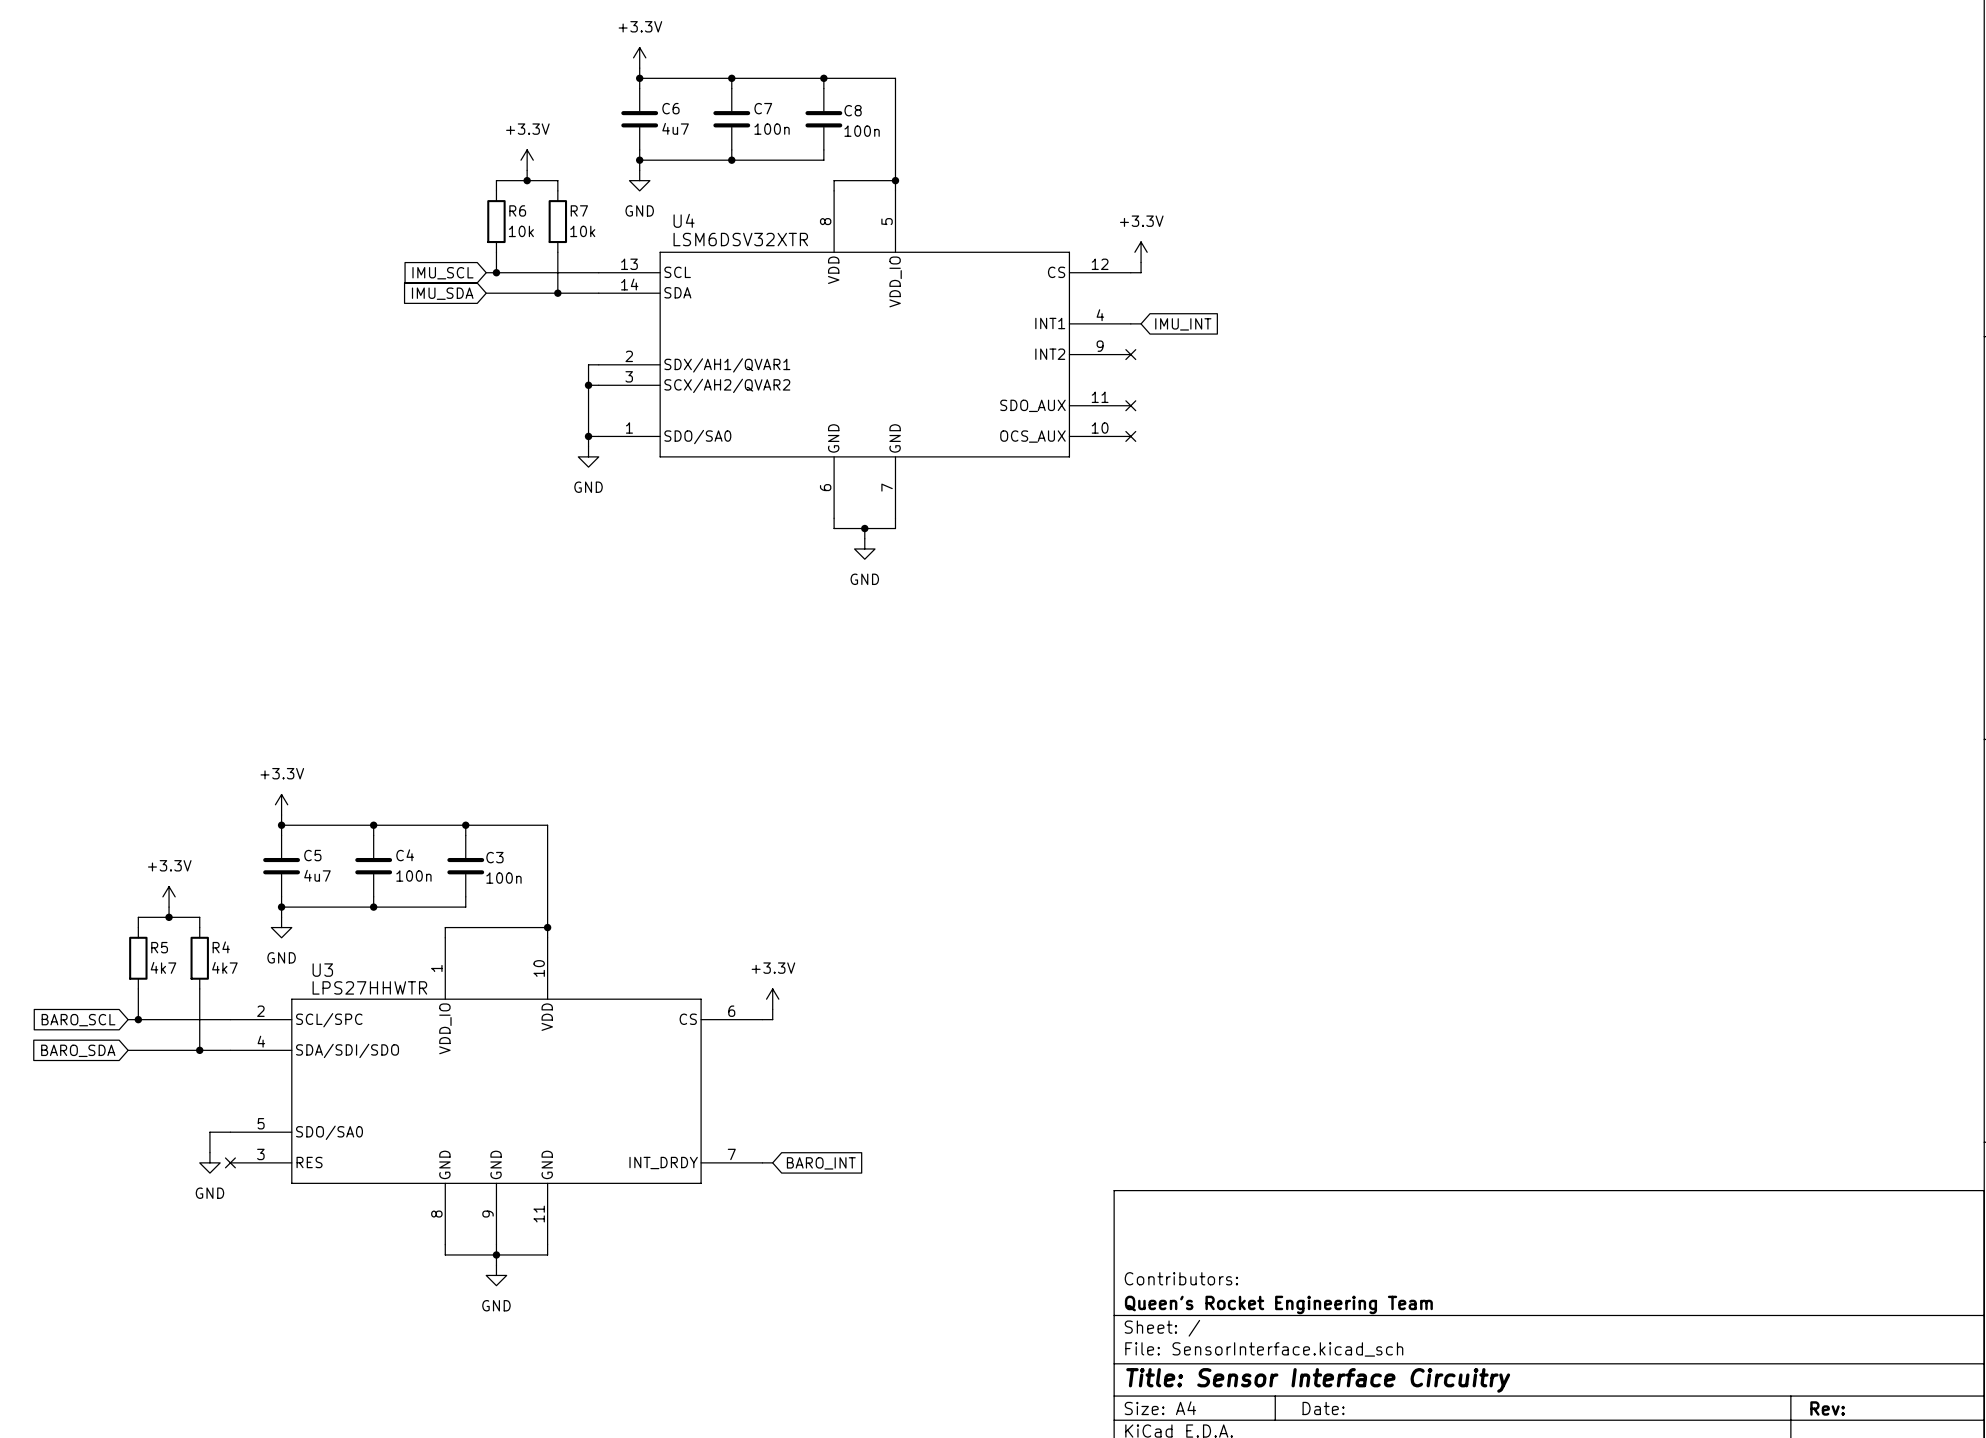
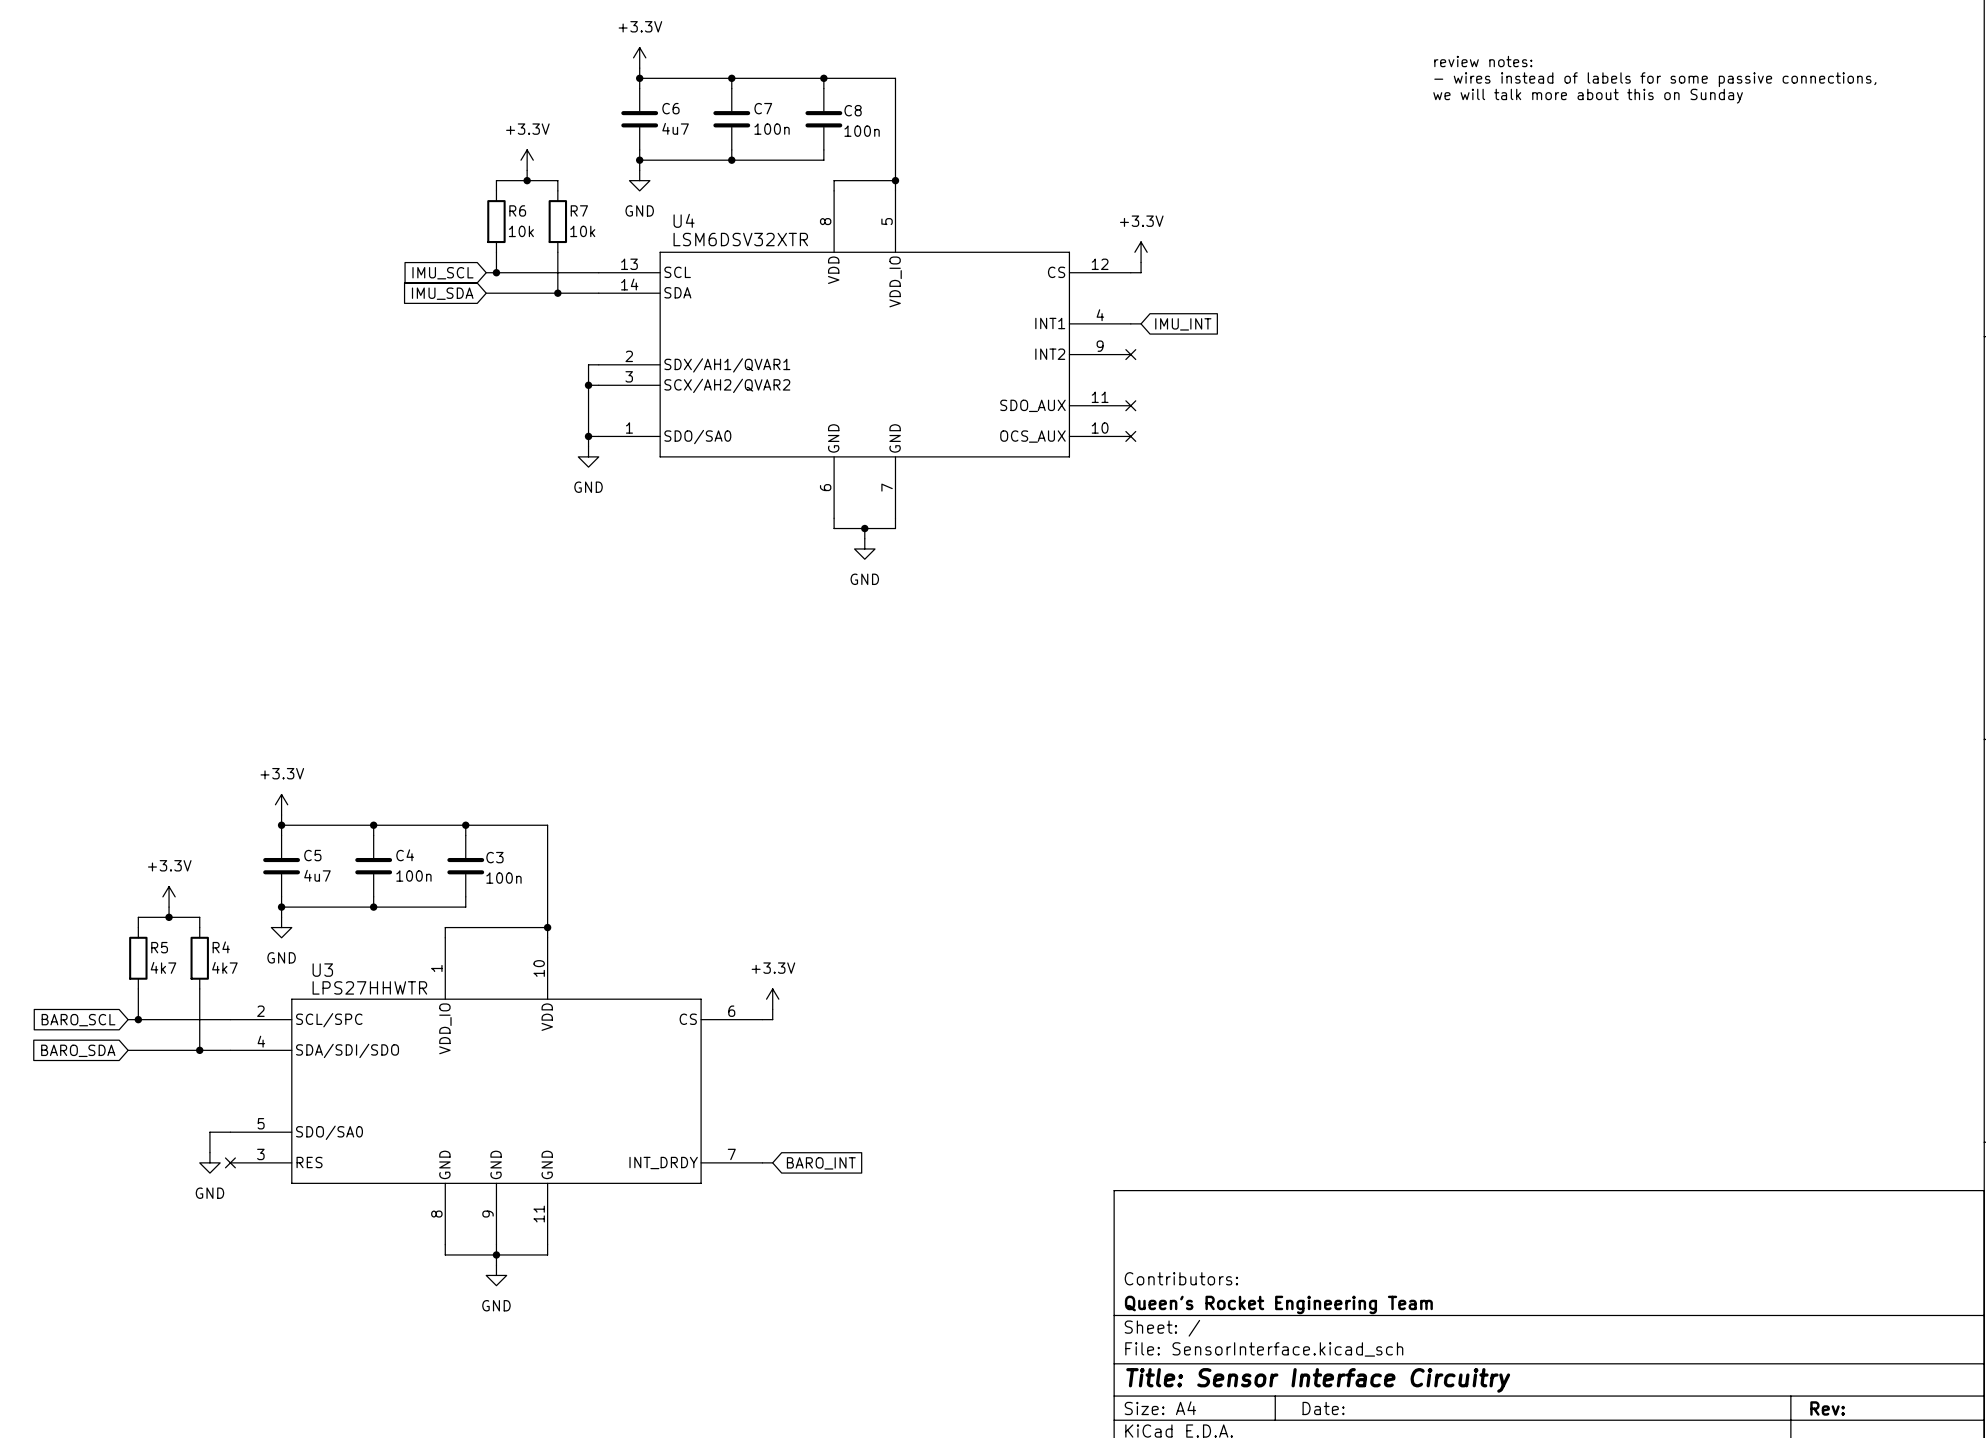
text: none -> review notes: (1483, 61)
text: none -> - wires instead of labels for some passive connections, (1655, 79)
text: none -> we will talk more about this on Sunday (1588, 96)

